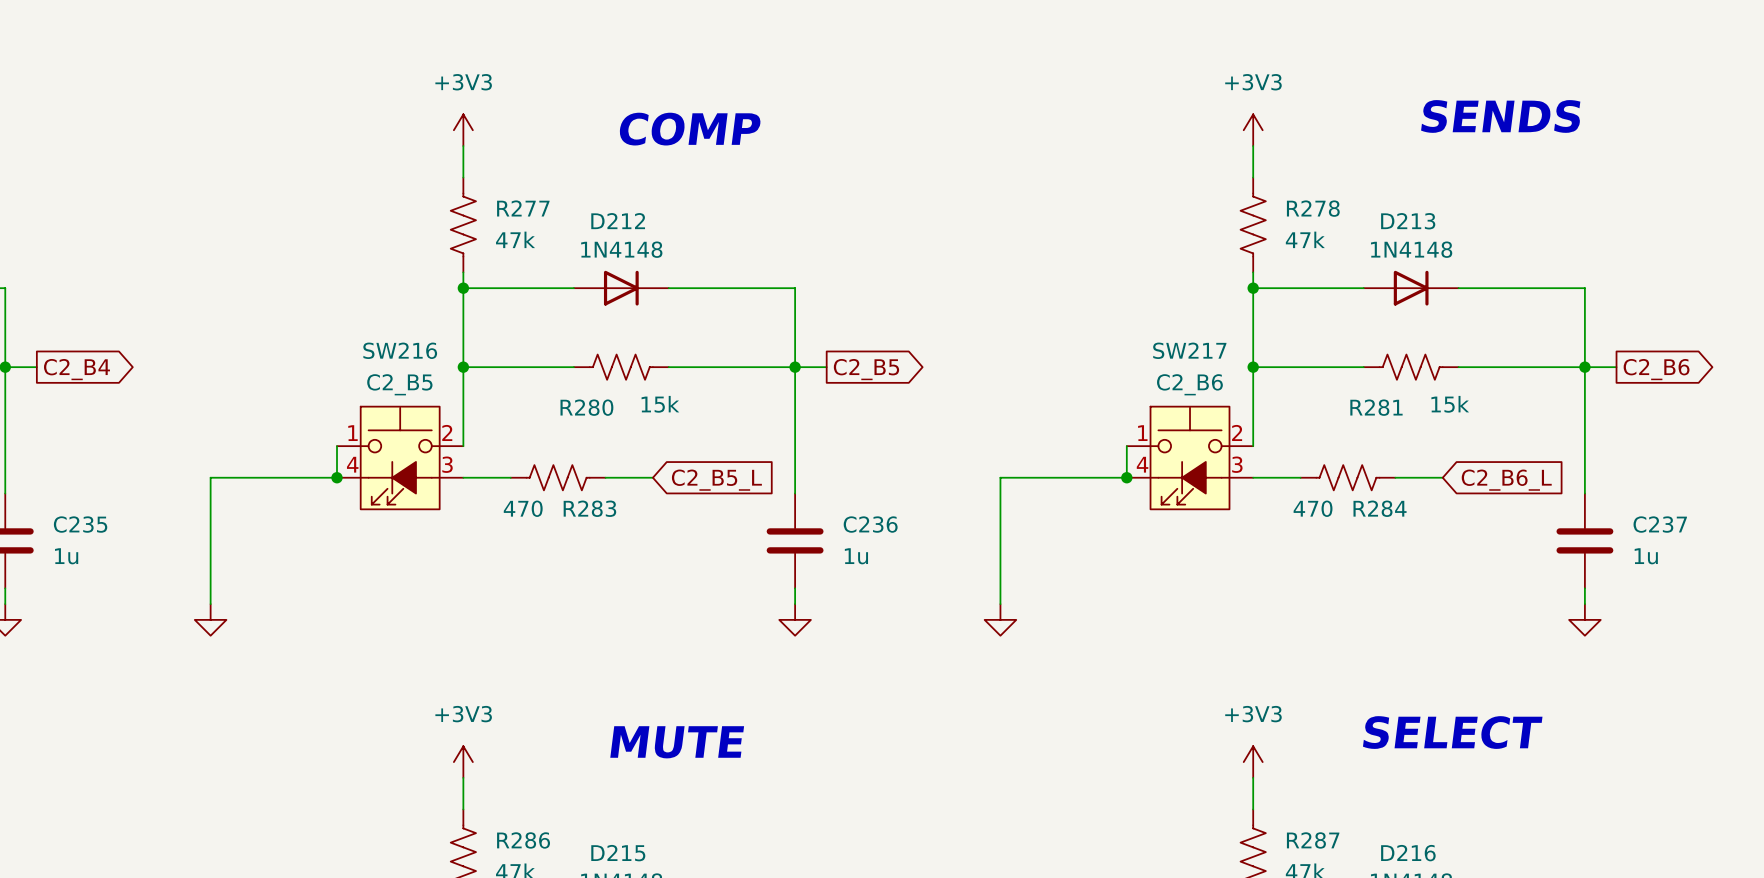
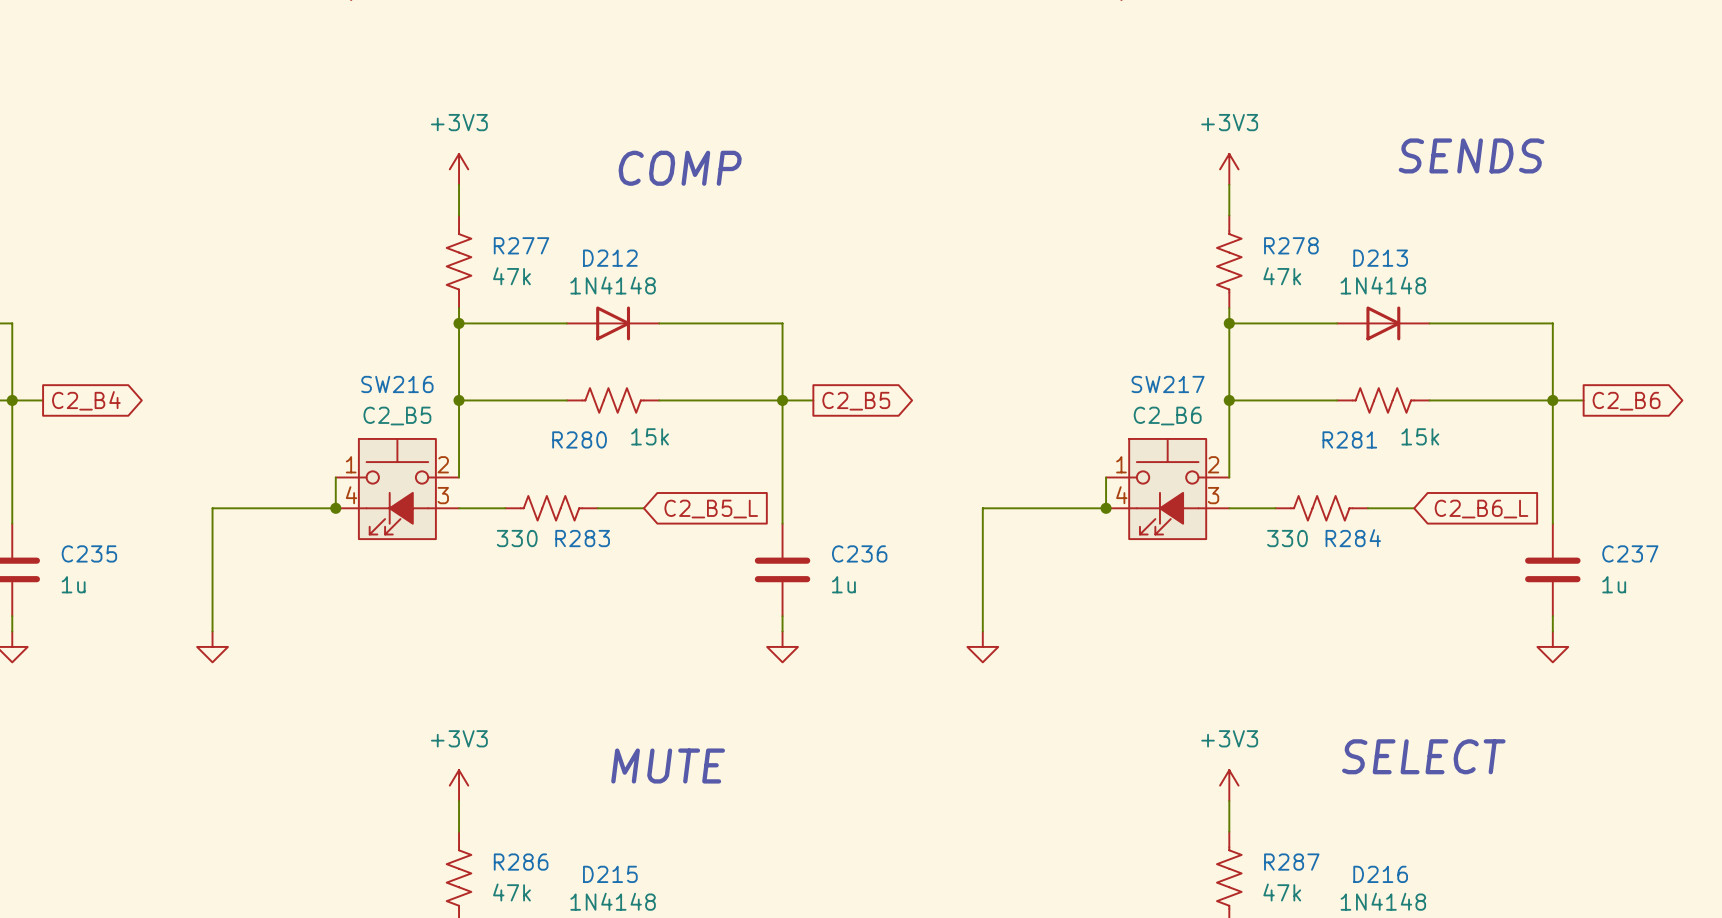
R283 value: 470 (523, 508) -> 330 (517, 538)
R284 value: 470 (1313, 508) -> 330 (1287, 538)

